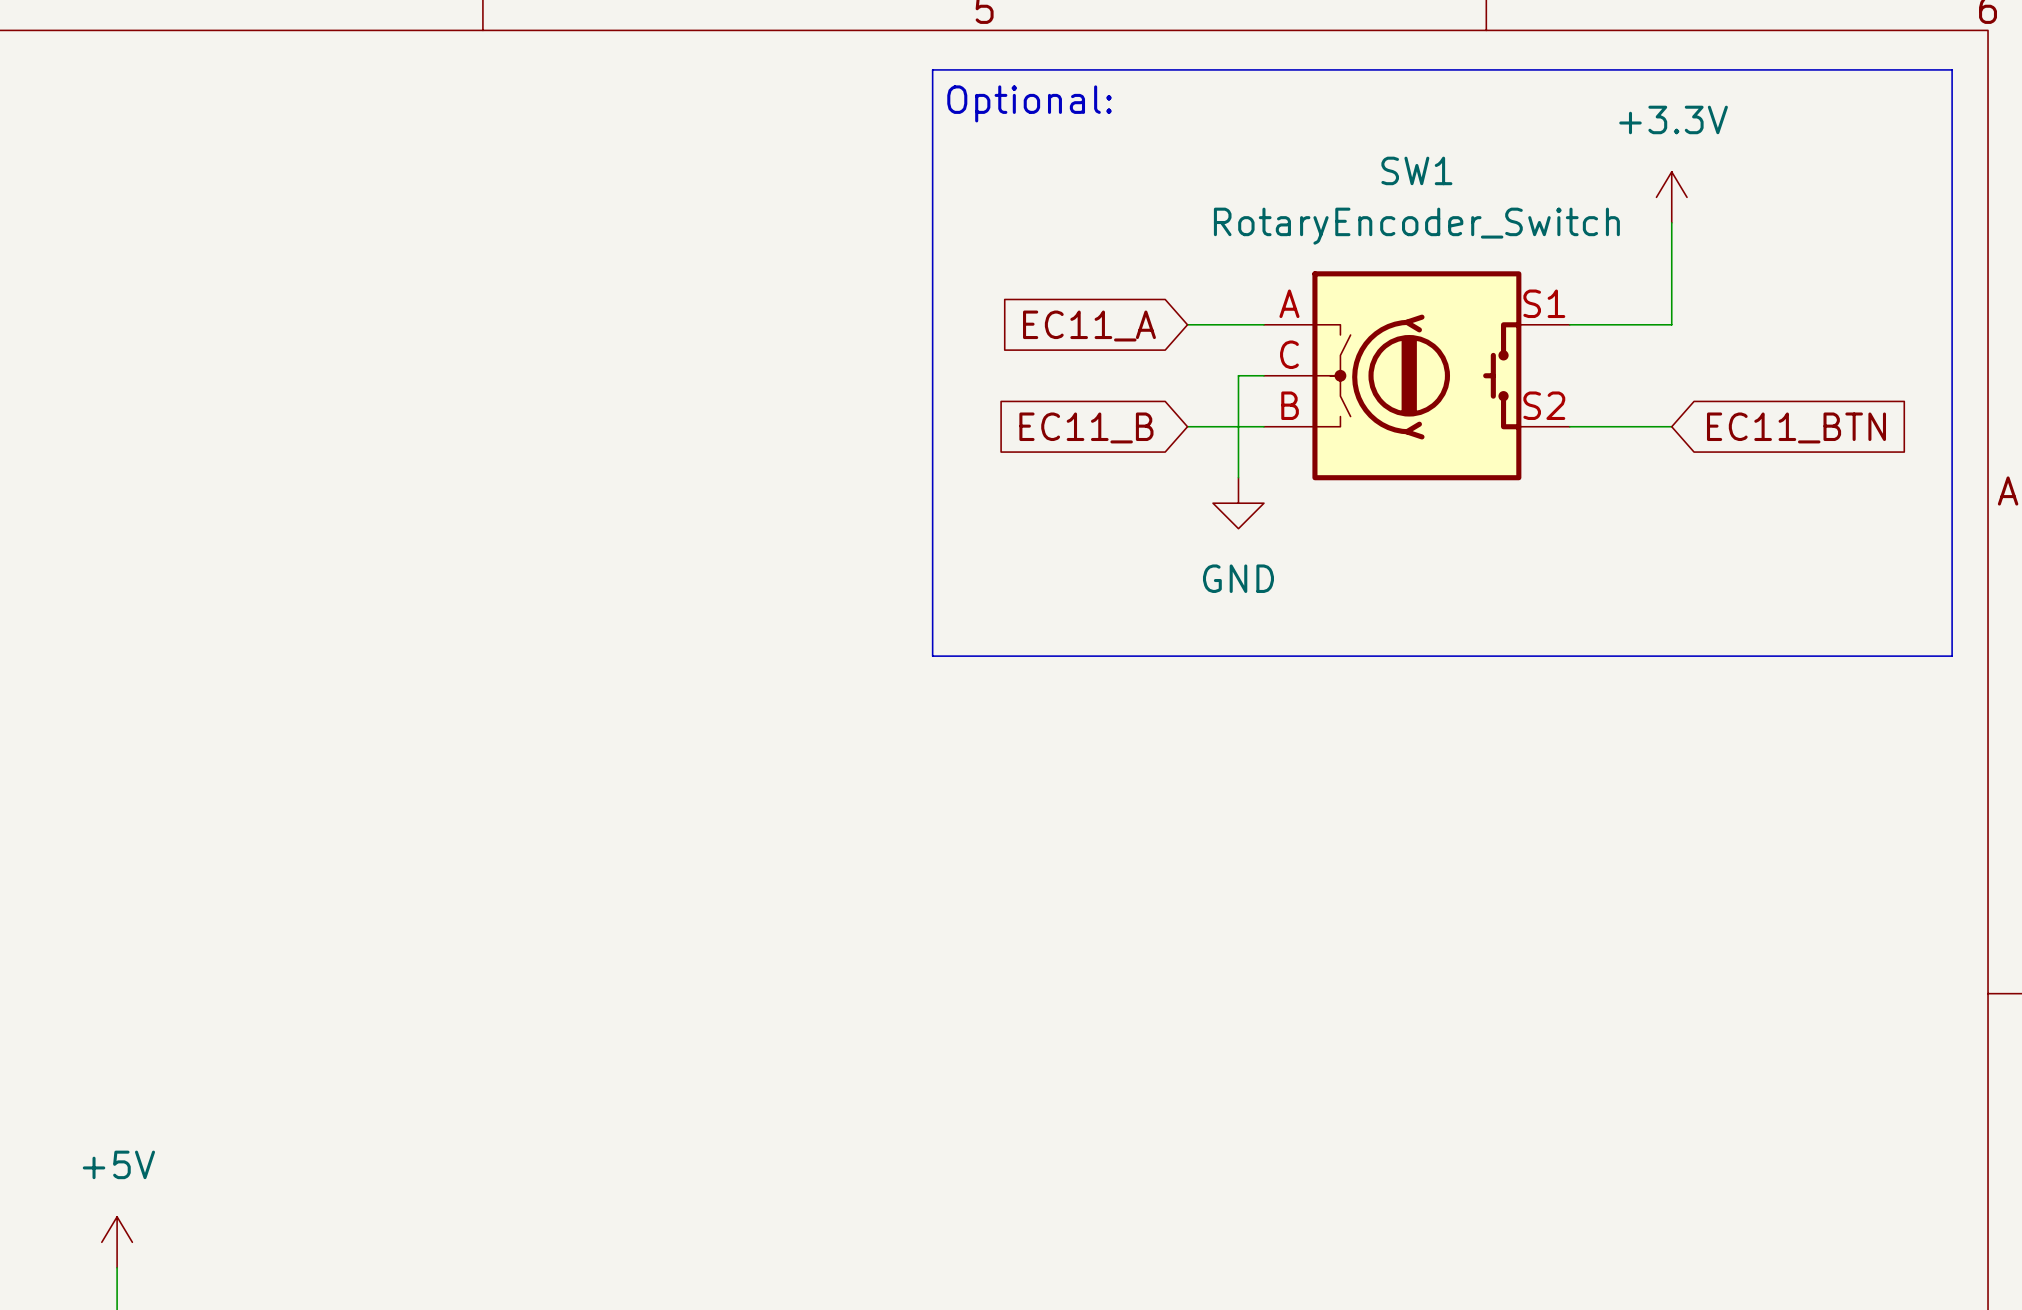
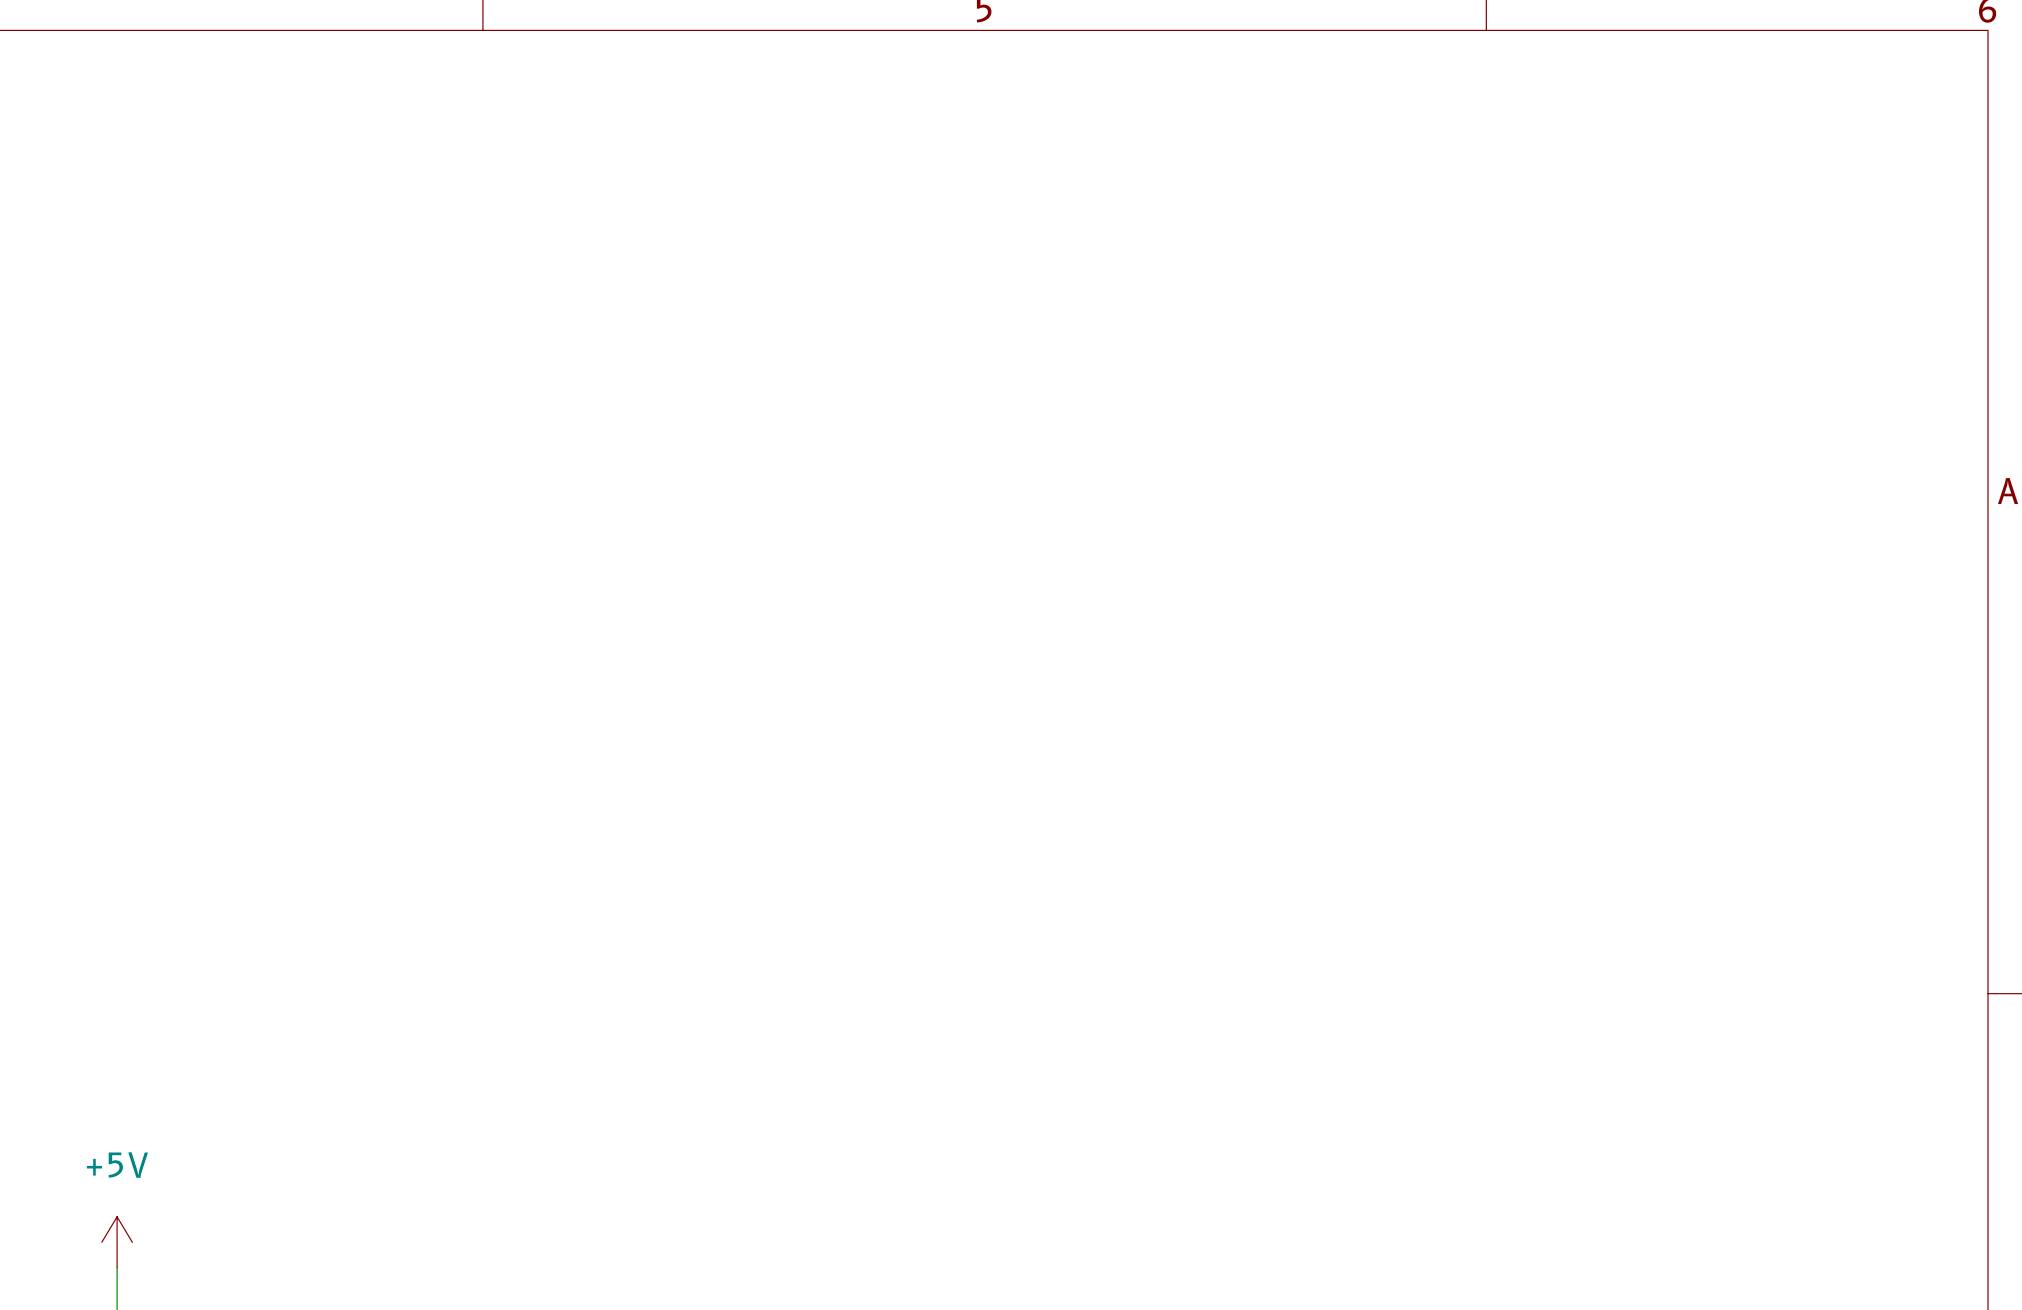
line: (932, 69) (1952, 69) (1952, 656) (932, 656) (932, 69) -> none
text: Optional: (1029, 103) -> none
power symbol: +3.3V (1671, 197) -> none
wire: (1671, 222) (1671, 324) (1569, 324) -> none
wire: (1187, 324) (1263, 324) -> none
global label: EC11_A (1089, 326) -> none
wire: (1263, 375) (1238, 375) (1238, 477) -> none
SW1: RotaryEncoder_Switch (1416, 375) -> none
wire: (1187, 426) (1263, 426) -> none
wire: (1569, 426) (1671, 426) -> none
global label: EC11_B (1086, 427) -> none
global label: EC11_BTN (1796, 427) -> none
power symbol: GND (1238, 503) -> none

